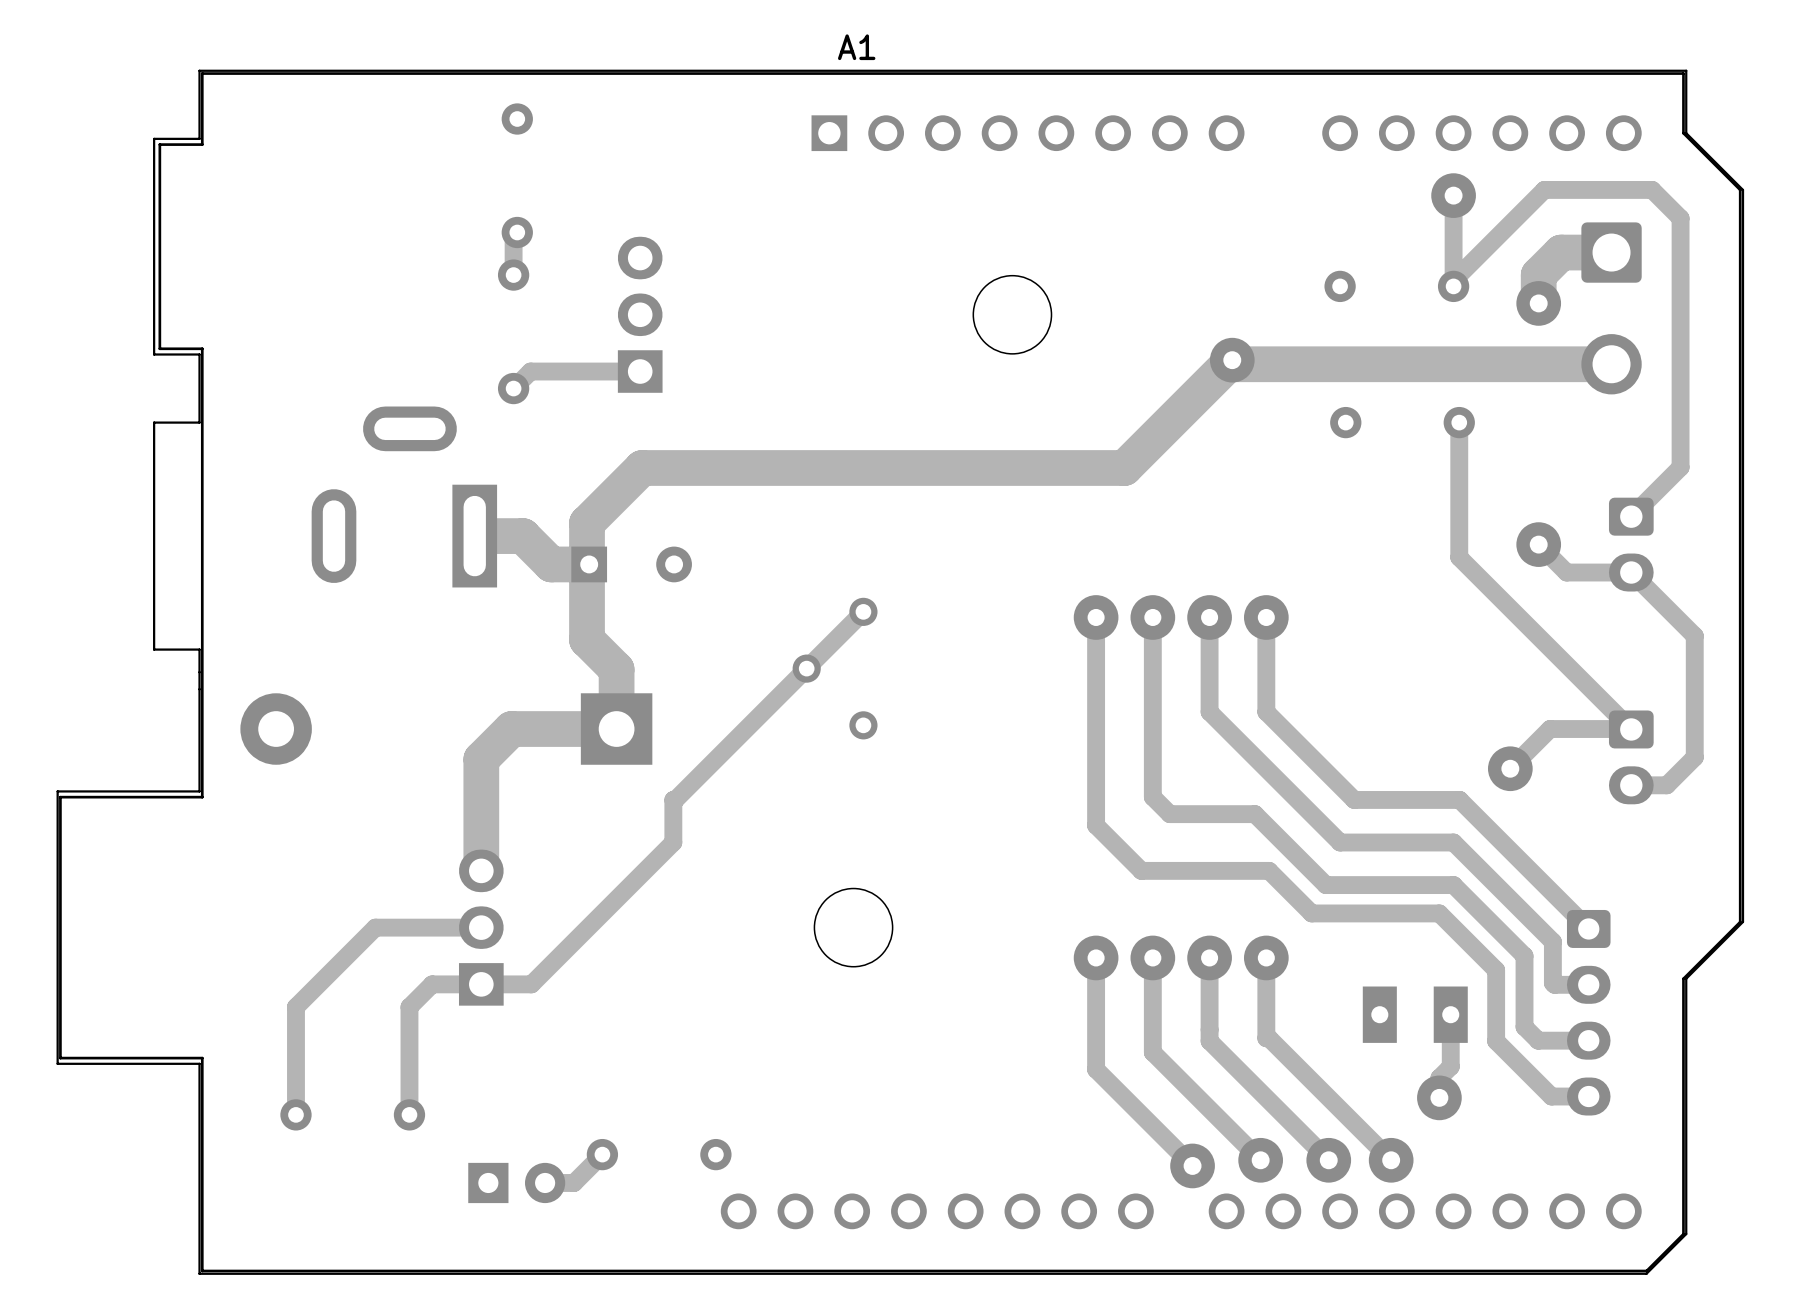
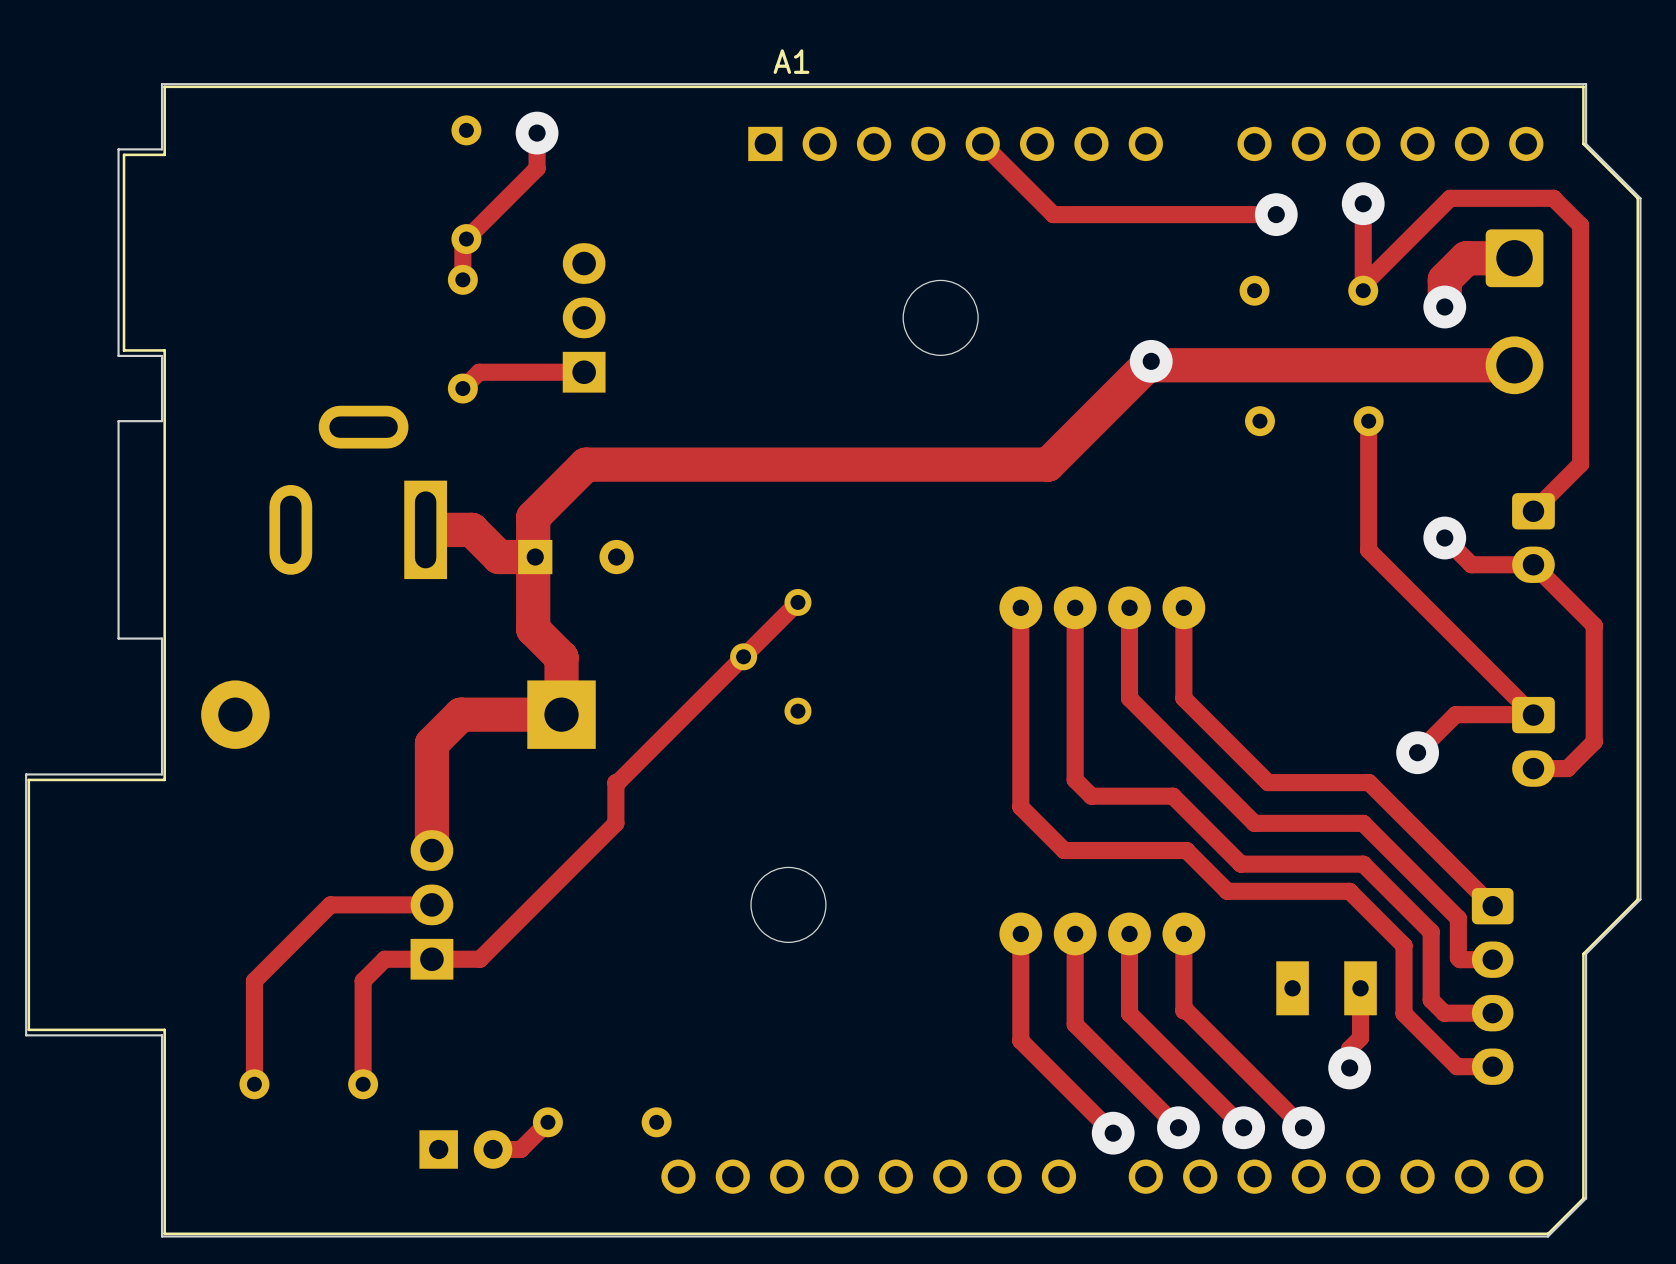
track: none -> (537, 133) (537, 168) (466, 239)
via: none -> (537, 133)
track: none -> (982, 143) (1053, 214) (1276, 214)
via: none -> (1276, 214)

